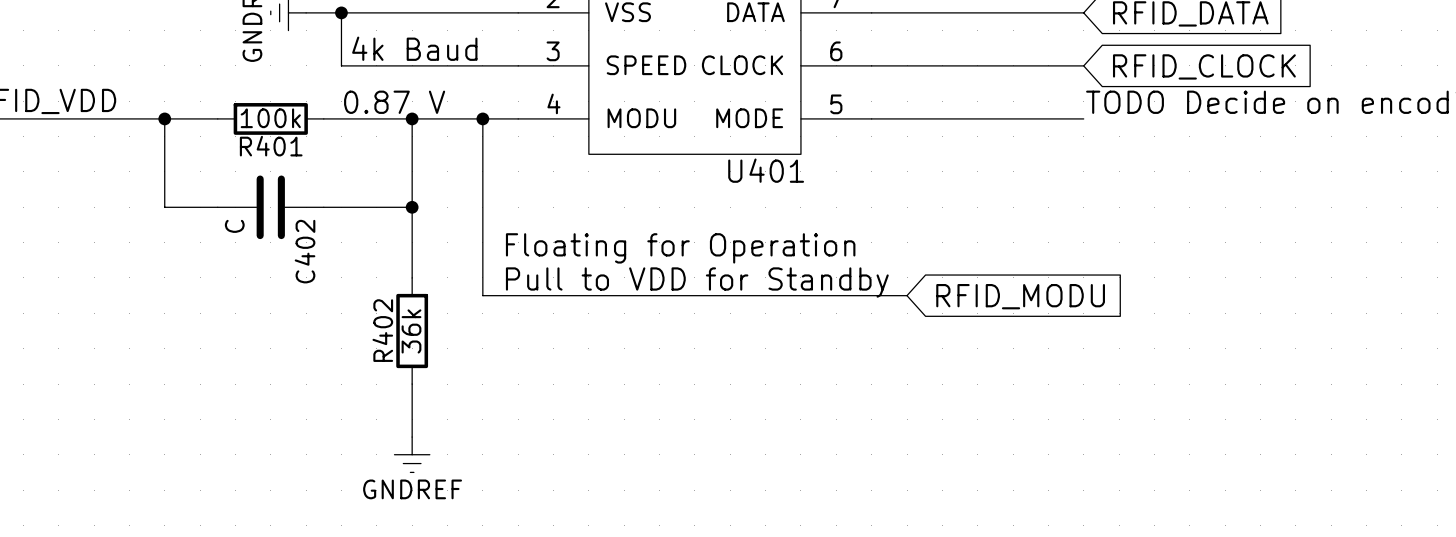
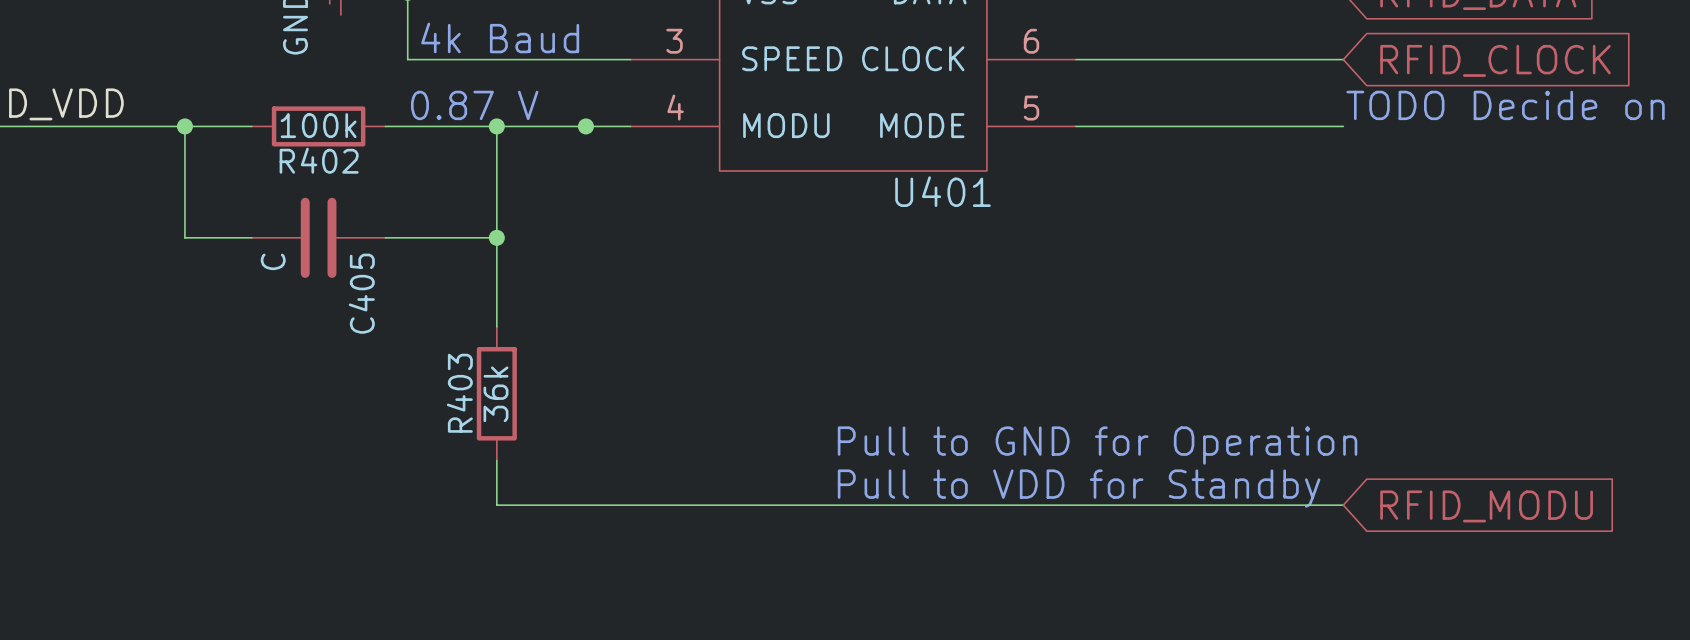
wire: (482, 118) (482, 295) (907, 295) -> none
R401 name: R401 (271, 146) -> R402 (319, 160)
text: Floating for Operation (680, 248) -> none
C402 name: C402 (305, 251) -> C405 (361, 293)
text position: Pull to VDD for Standby (697, 282) -> Pull to VDD for Standby (1079, 488)
global label position: RFID_MODU (1020, 296) -> RFID_MODU (1486, 506)
R402 name: R402 (382, 330) -> R403 (459, 393)
text: none -> Pull to GND for Operation (1097, 445)
wire: (412, 419) (412, 437) -> (496, 505) (1343, 505)
power symbol: GNDREF (412, 454) -> none

